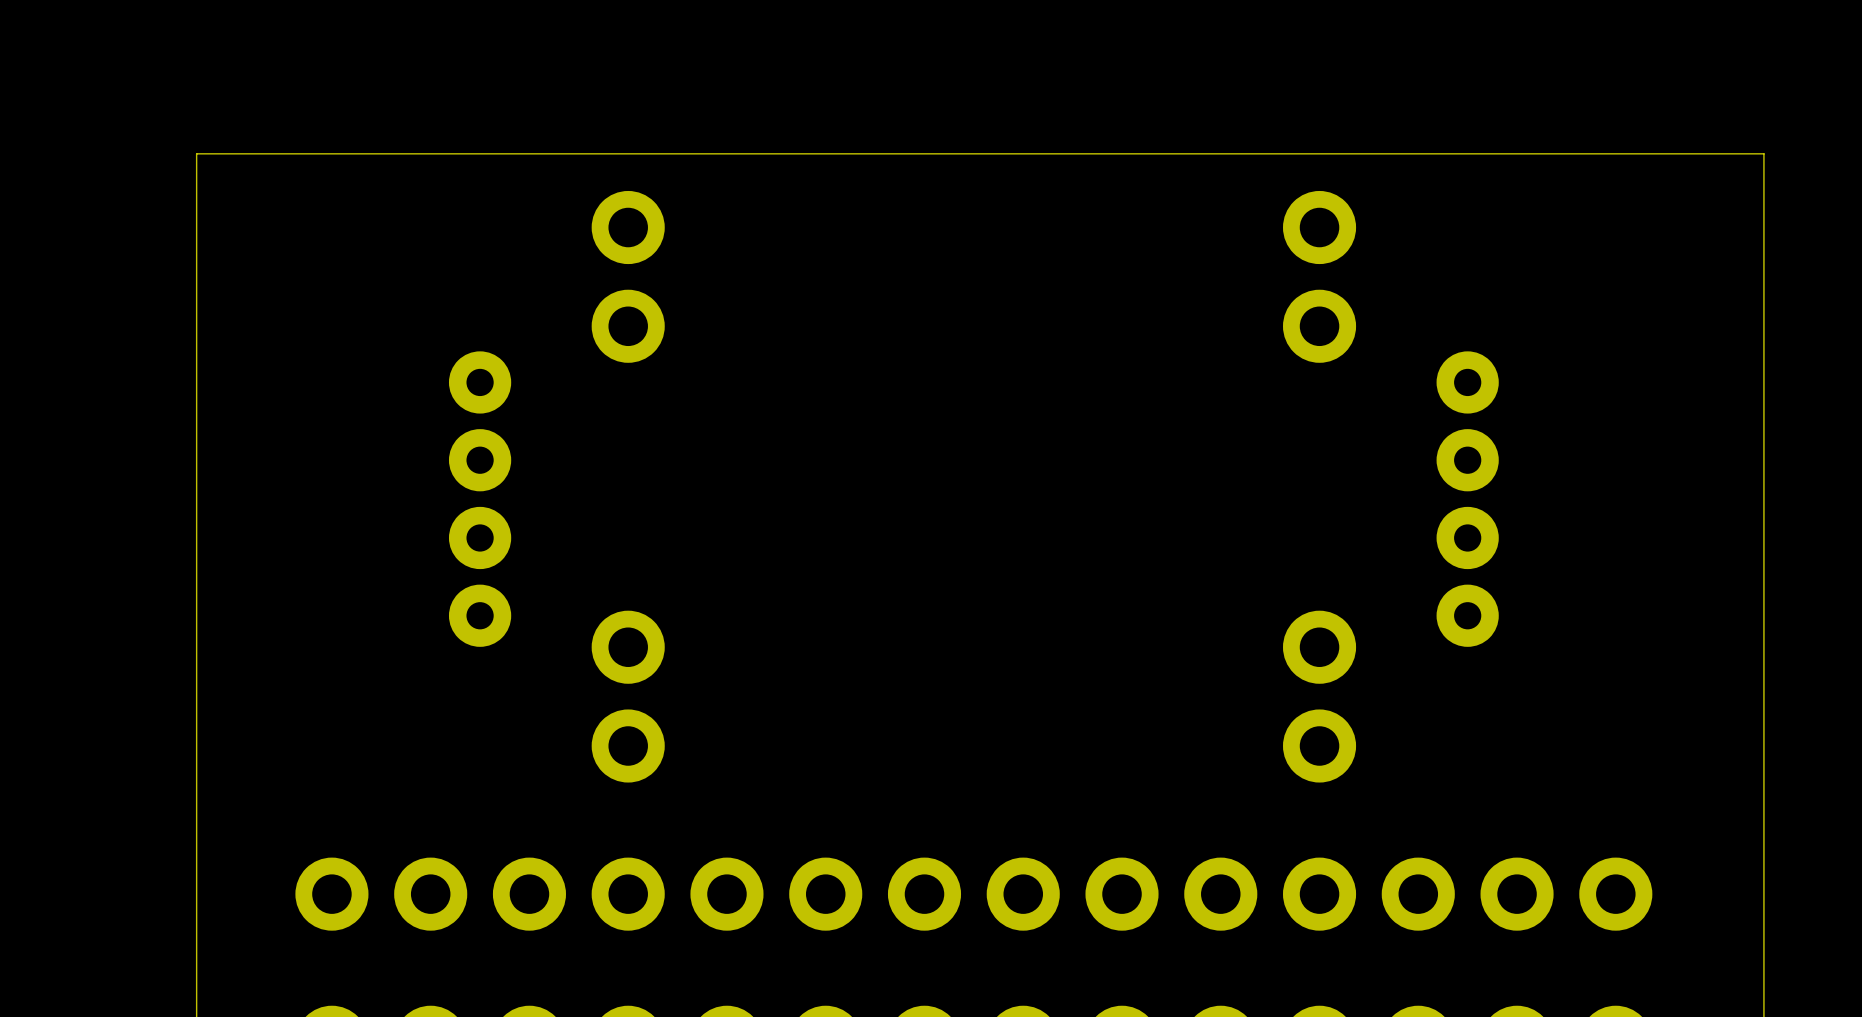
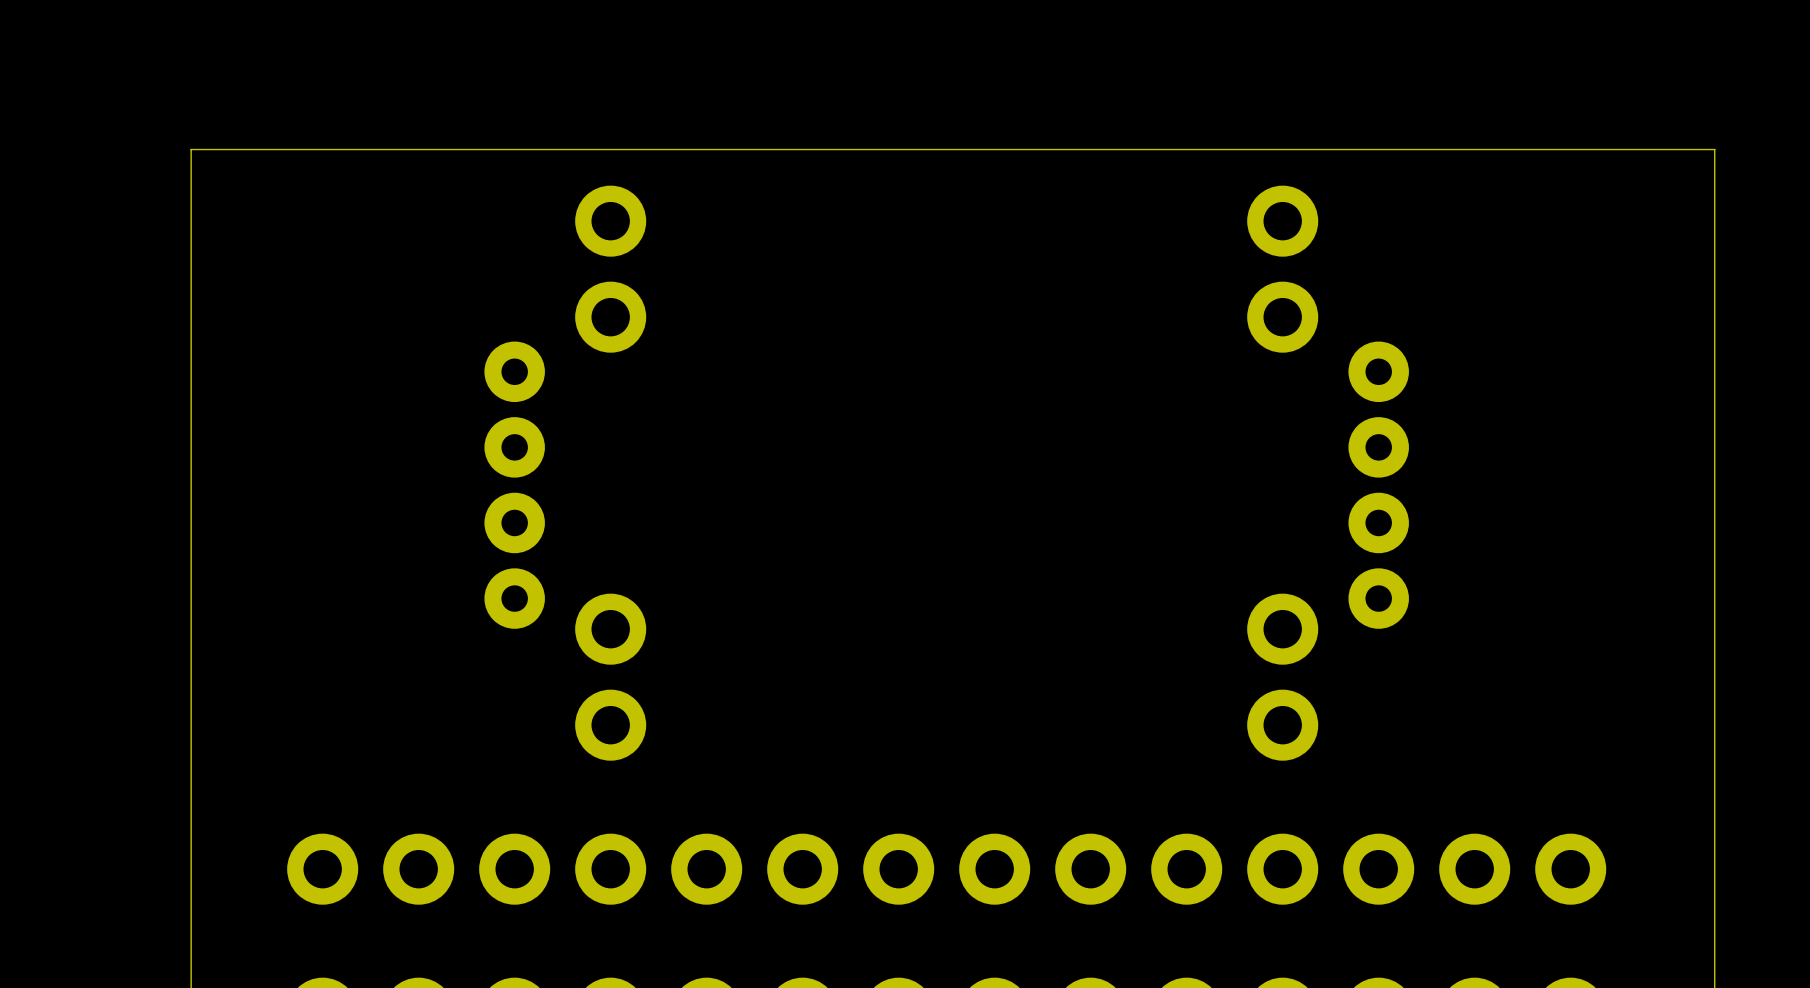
part position: (480, 499) -> (514, 485)
part position: (1467, 499) -> (1378, 485)

